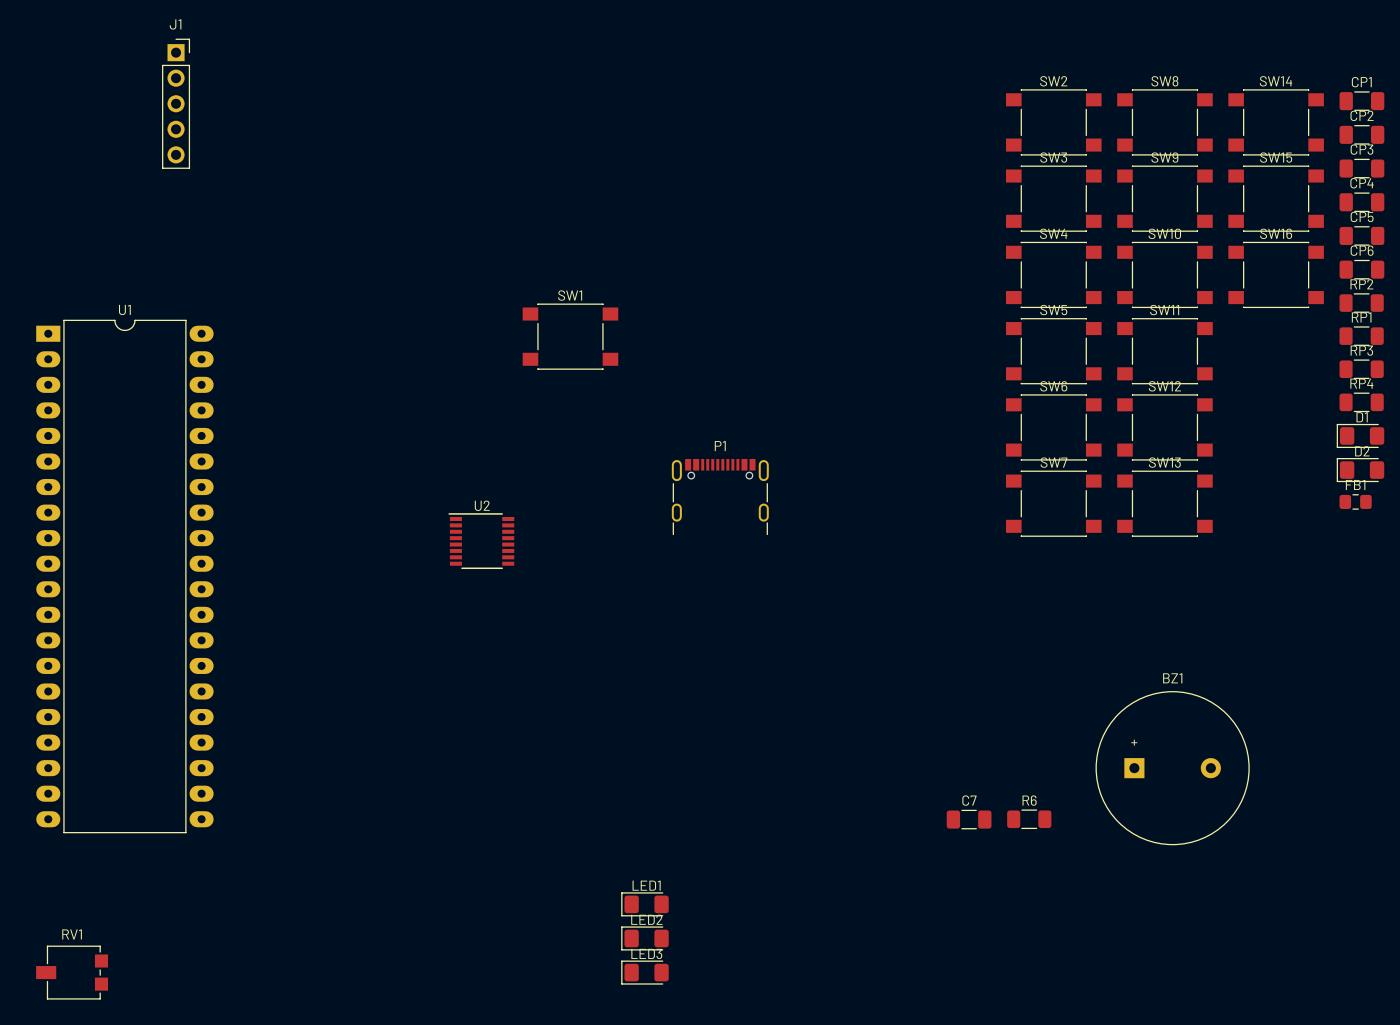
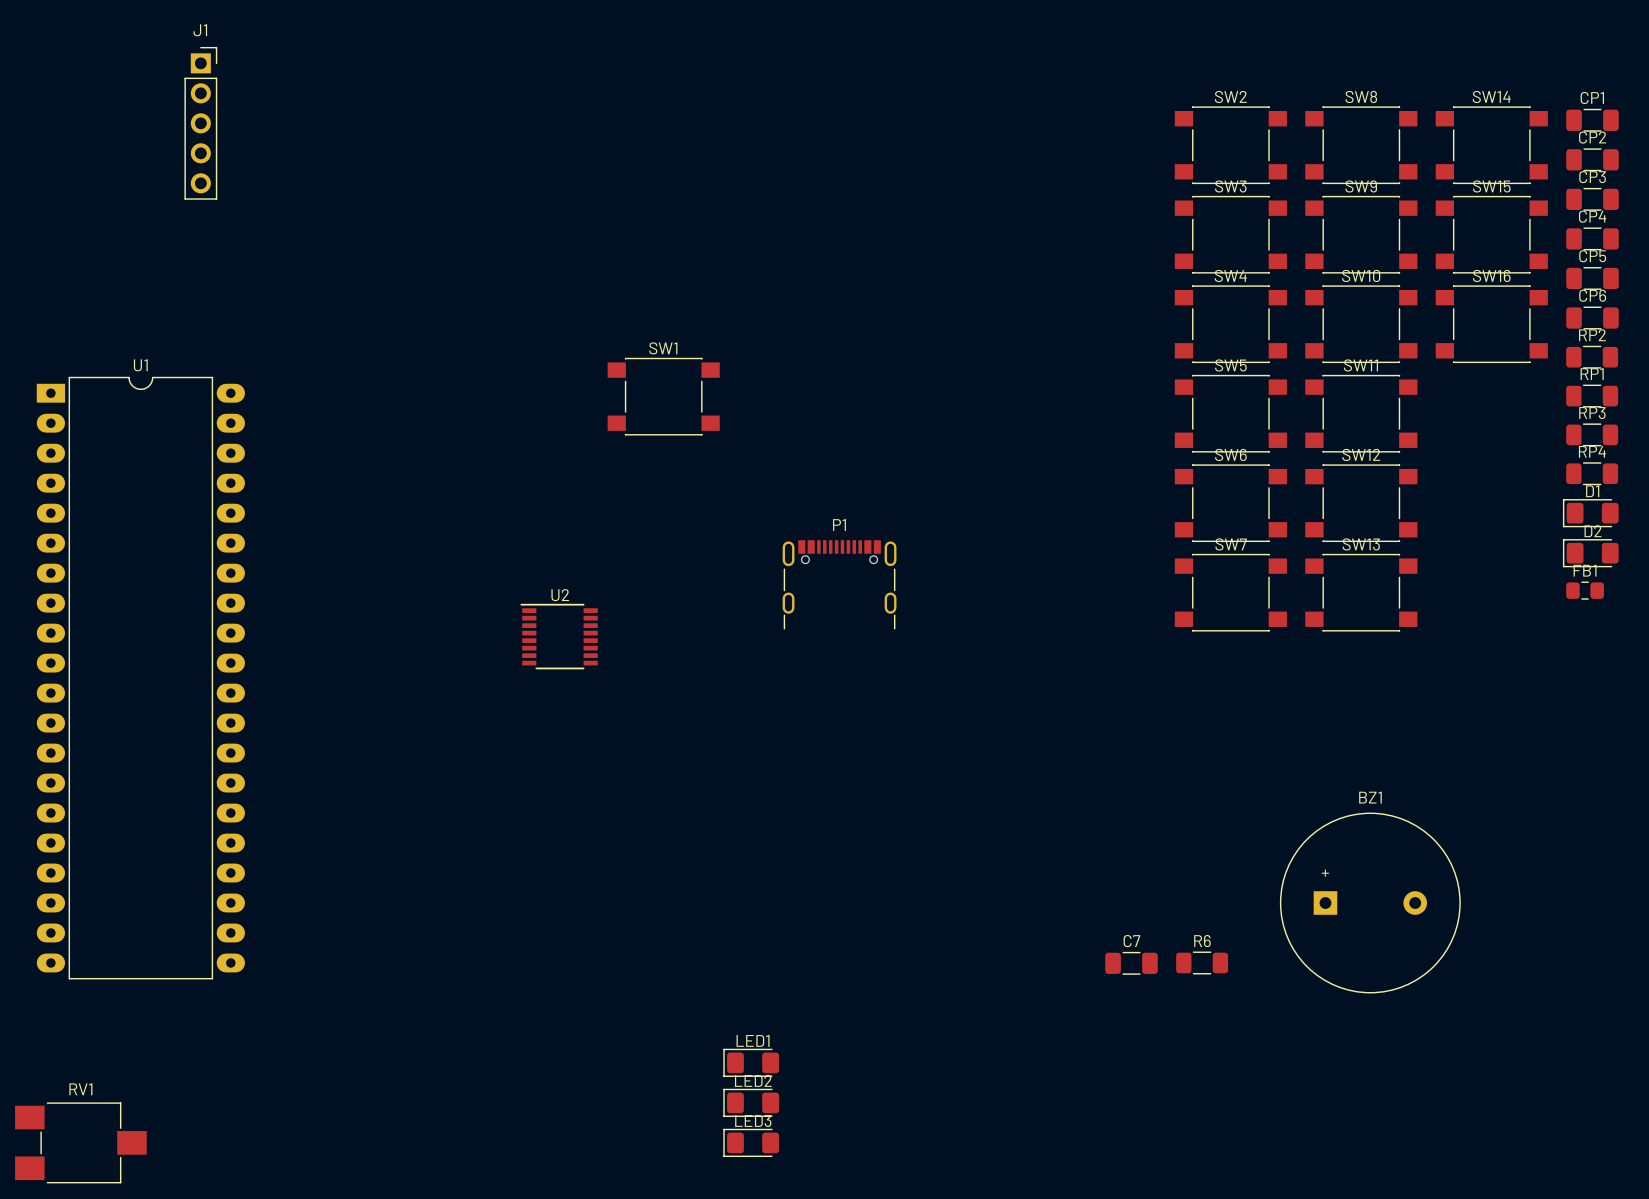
RV1 footprint: [36, 945, 109, 1000] -> [15, 1102, 147, 1184]

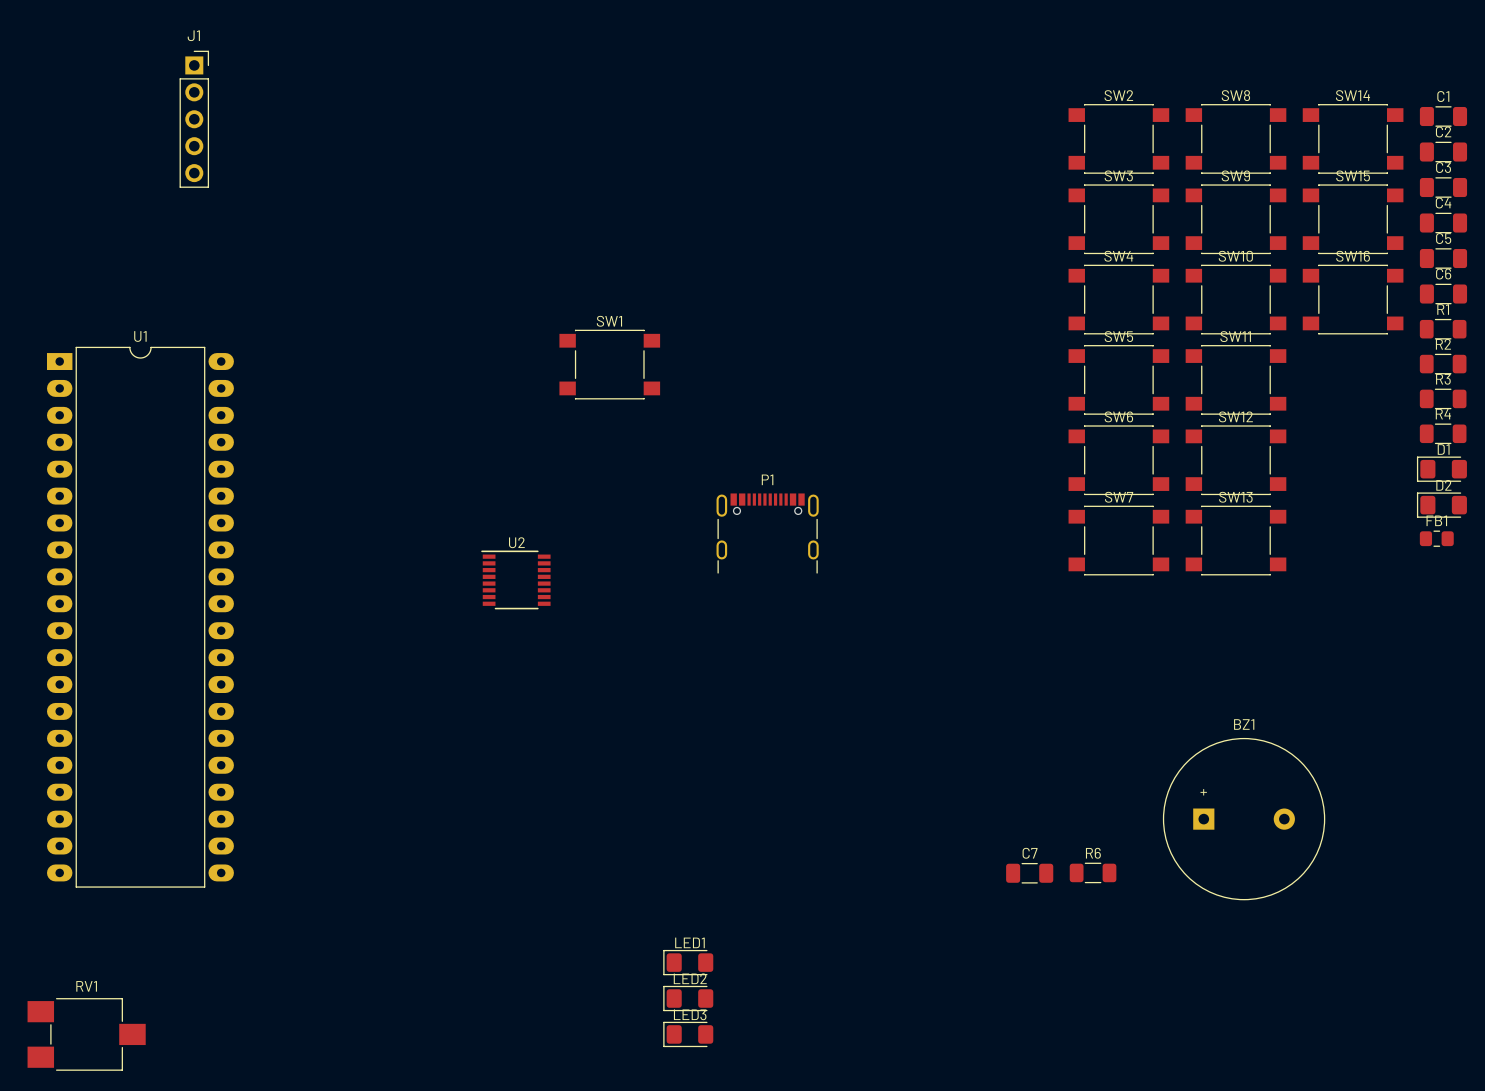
CP1 name: CP1 (1592, 97) -> C1 (1443, 96)
CP2 name: CP2 (1592, 137) -> C2 (1443, 132)
CP3 name: CP3 (1592, 177) -> C3 (1443, 167)
CP4 name: CP4 (1592, 216) -> C4 (1443, 203)
CP5 name: CP5 (1592, 256) -> C5 (1443, 238)
CP6 name: CP6 (1592, 295) -> C6 (1443, 274)
RP2 name: RP2 (1592, 335) -> R1 (1443, 309)
RP1 name: RP1 (1592, 374) -> R2 (1443, 344)
RP3 name: RP3 (1592, 413) -> R3 (1443, 379)
RP4 name: RP4 (1592, 451) -> R4 (1443, 414)

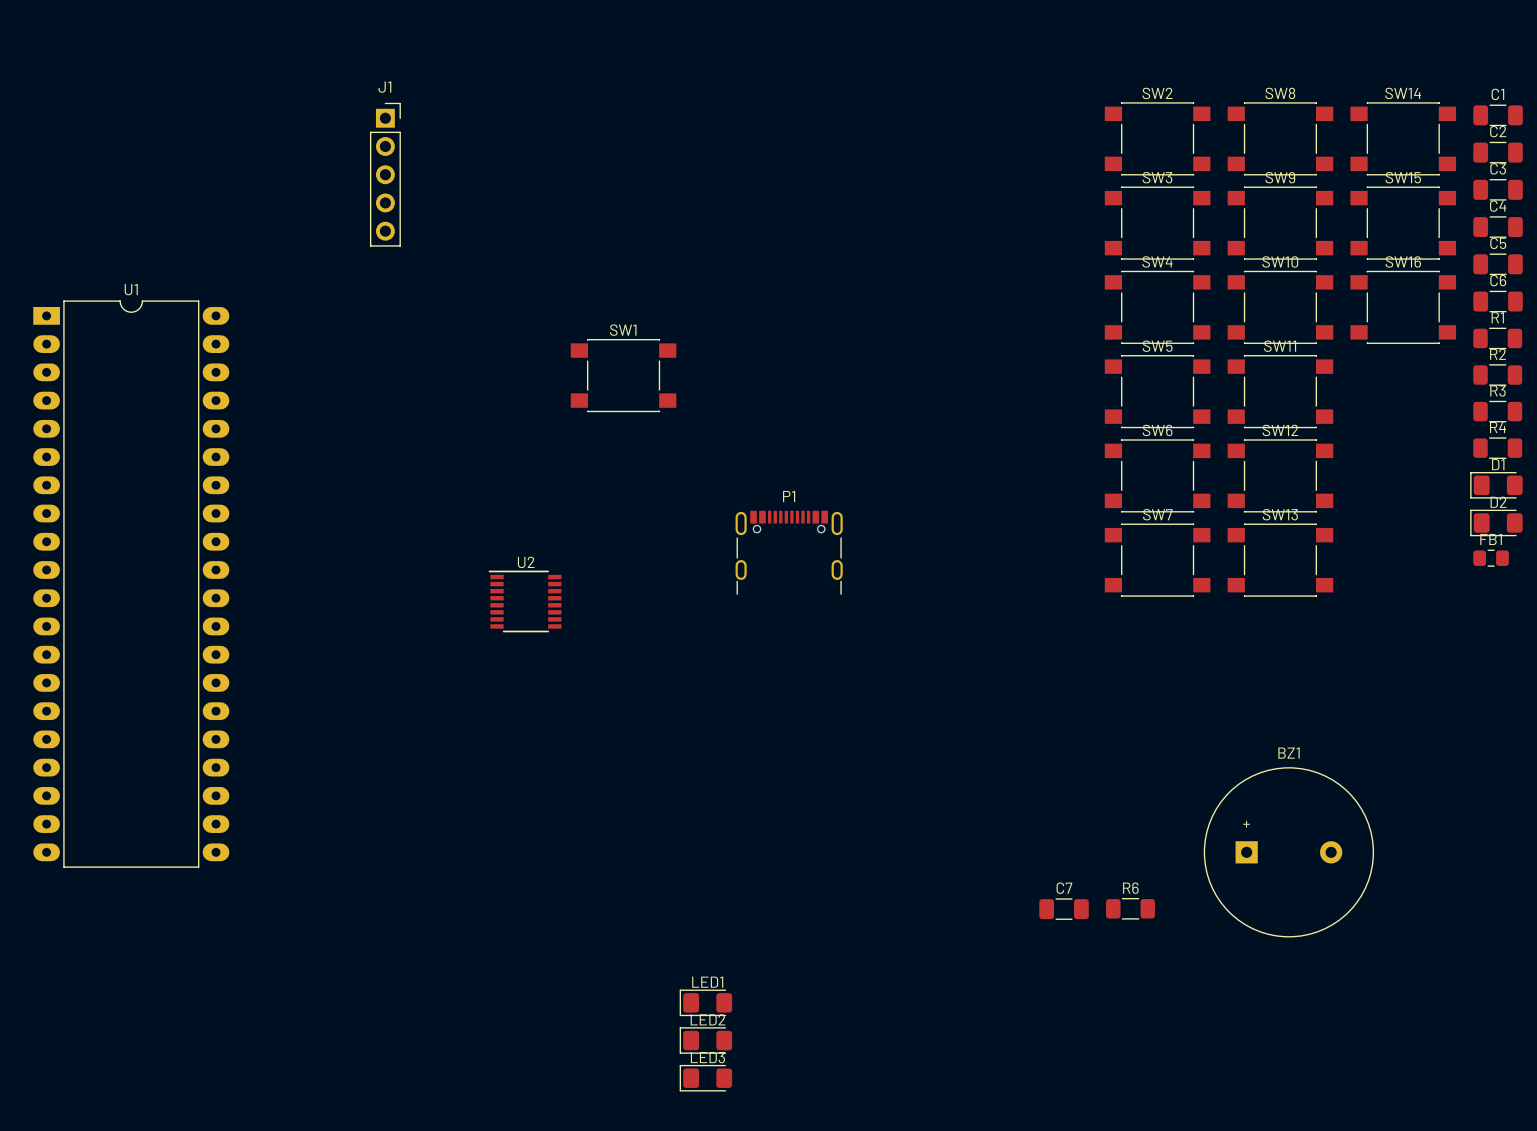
J1 position: (194, 119) -> (385, 174)
U1 position: (140, 617) -> (131, 584)
RV1: (86, 1034) -> none

